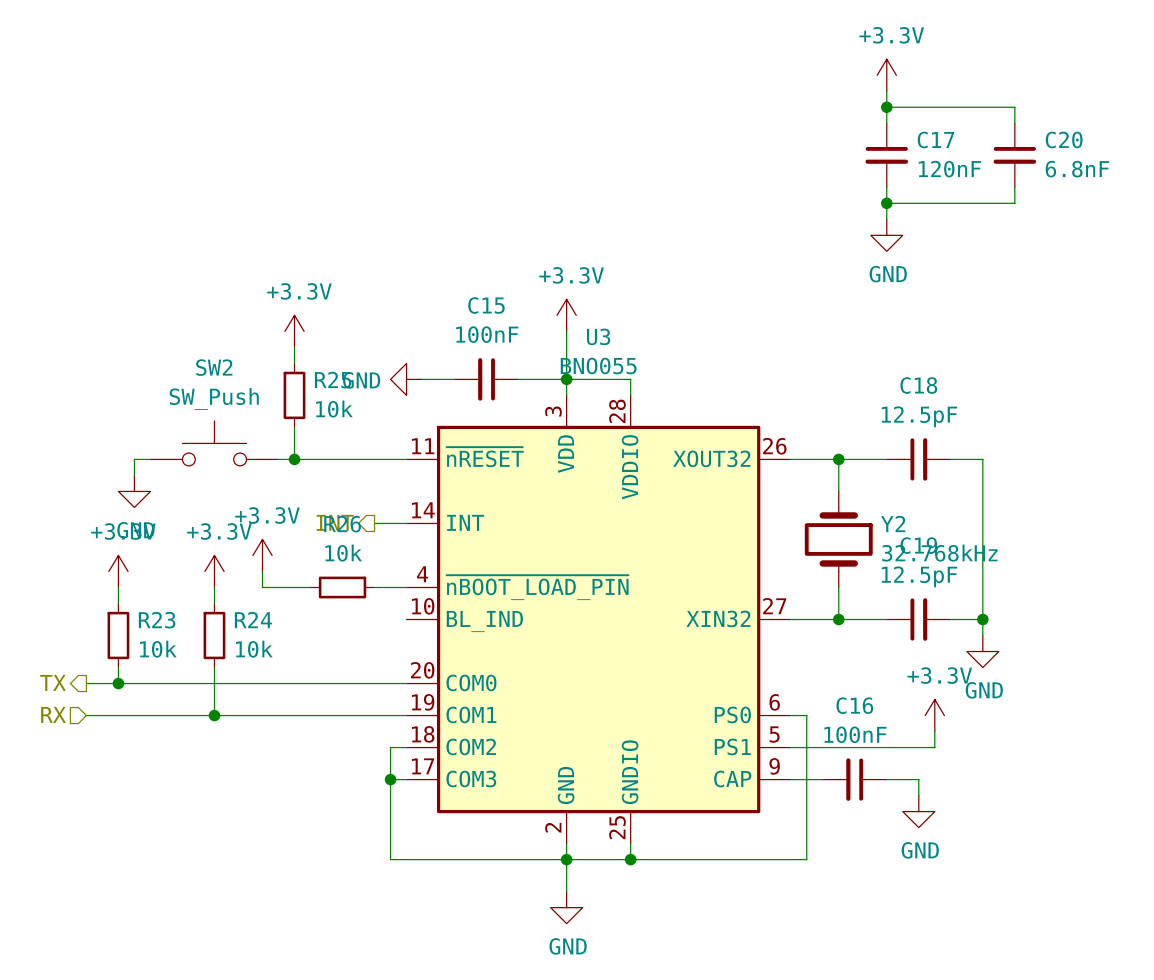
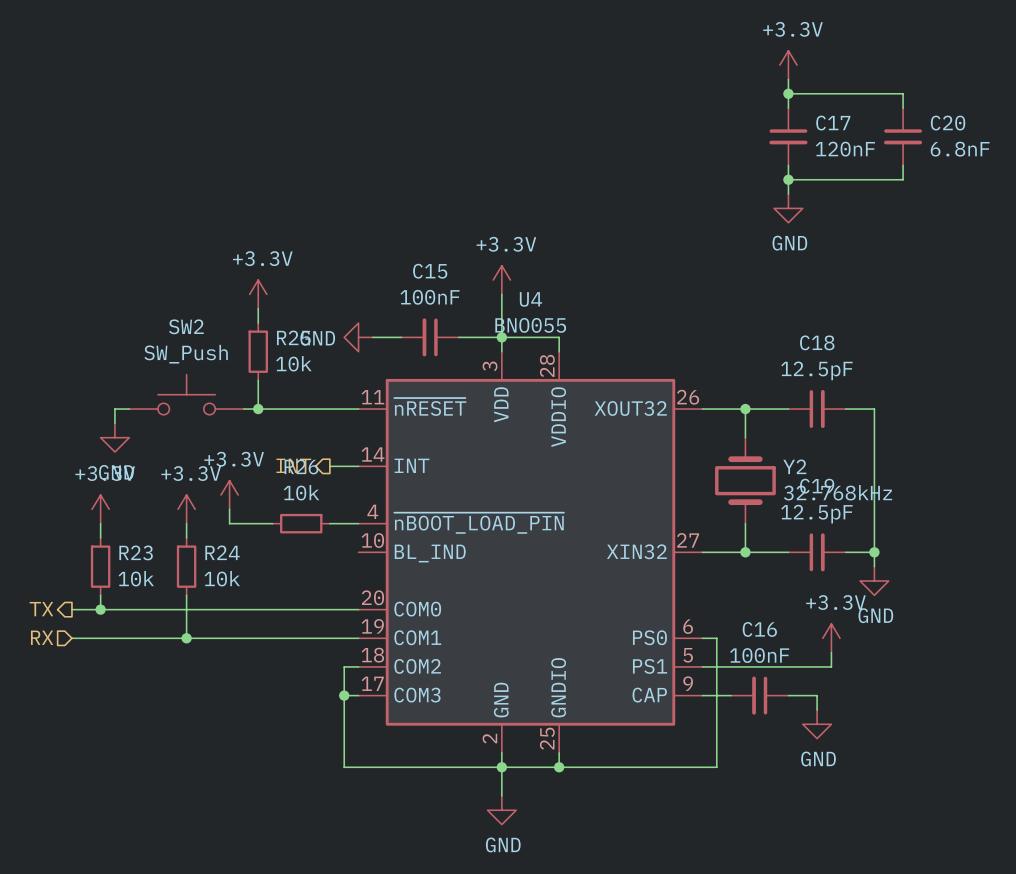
U3 name: U3 (598, 336) -> U4 (530, 299)

